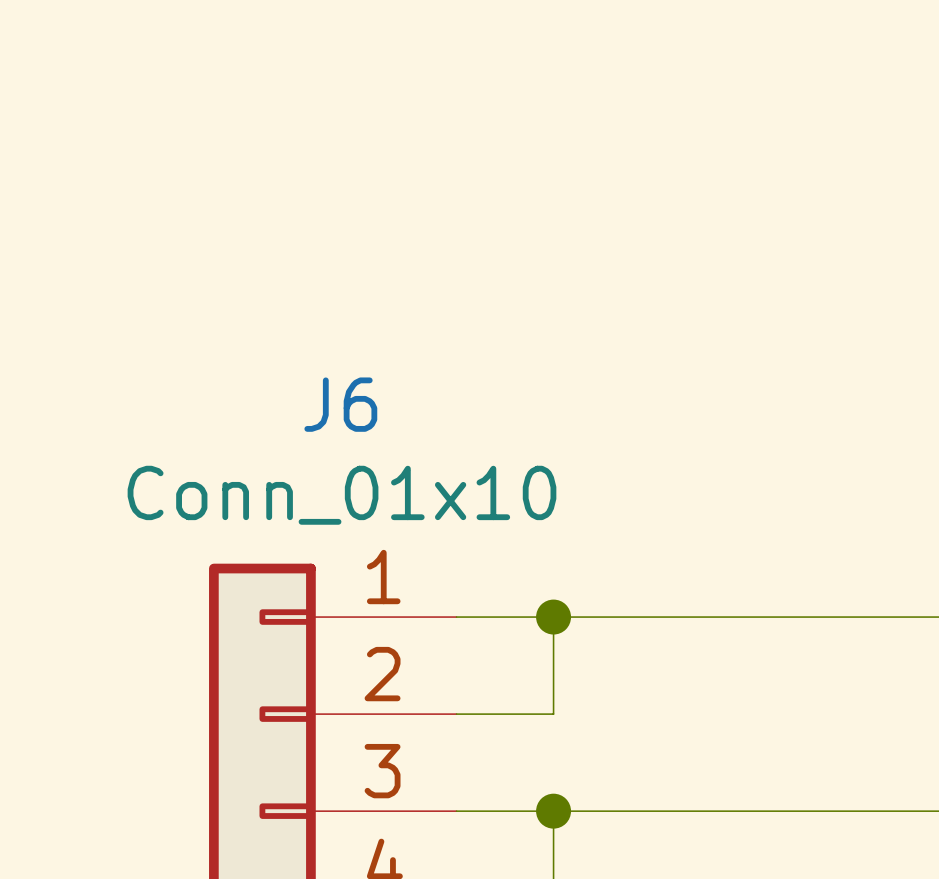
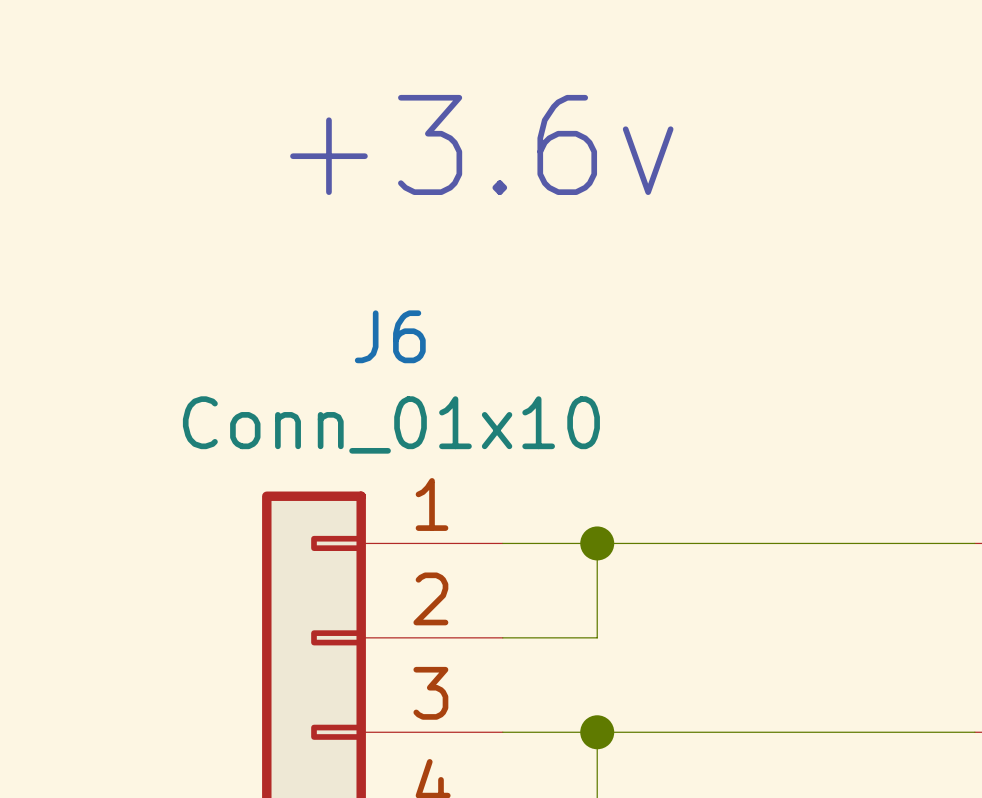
text: none -> +3.6v (481, 144)

